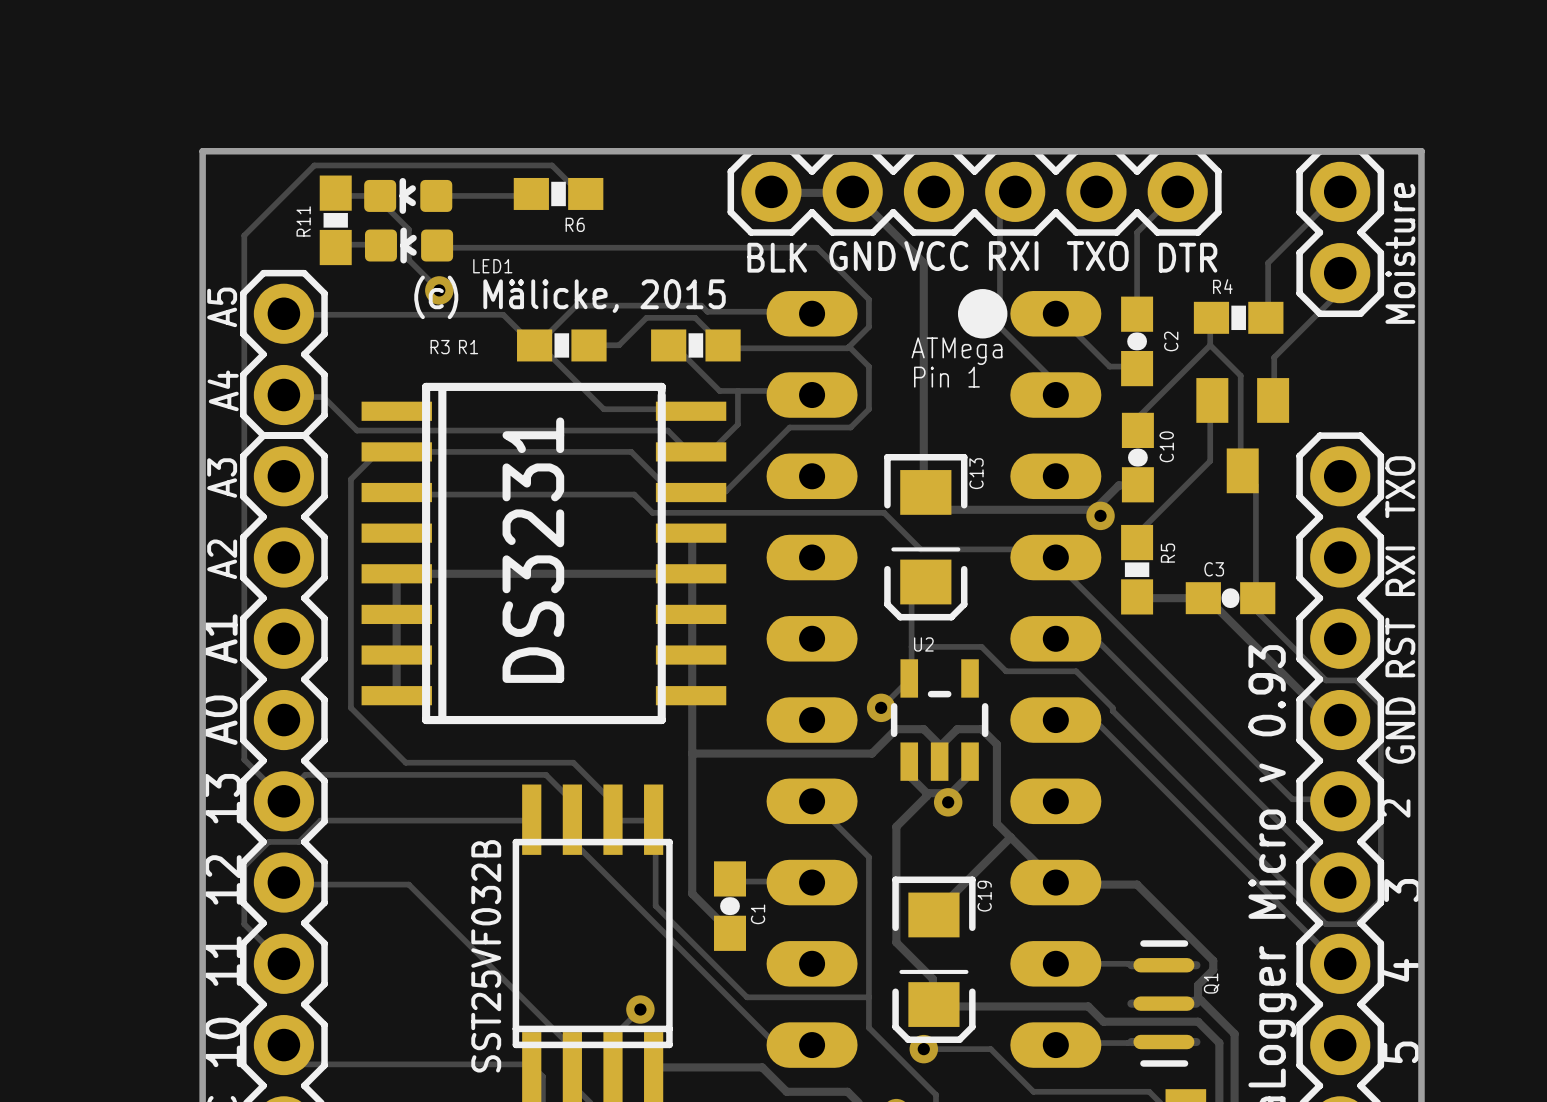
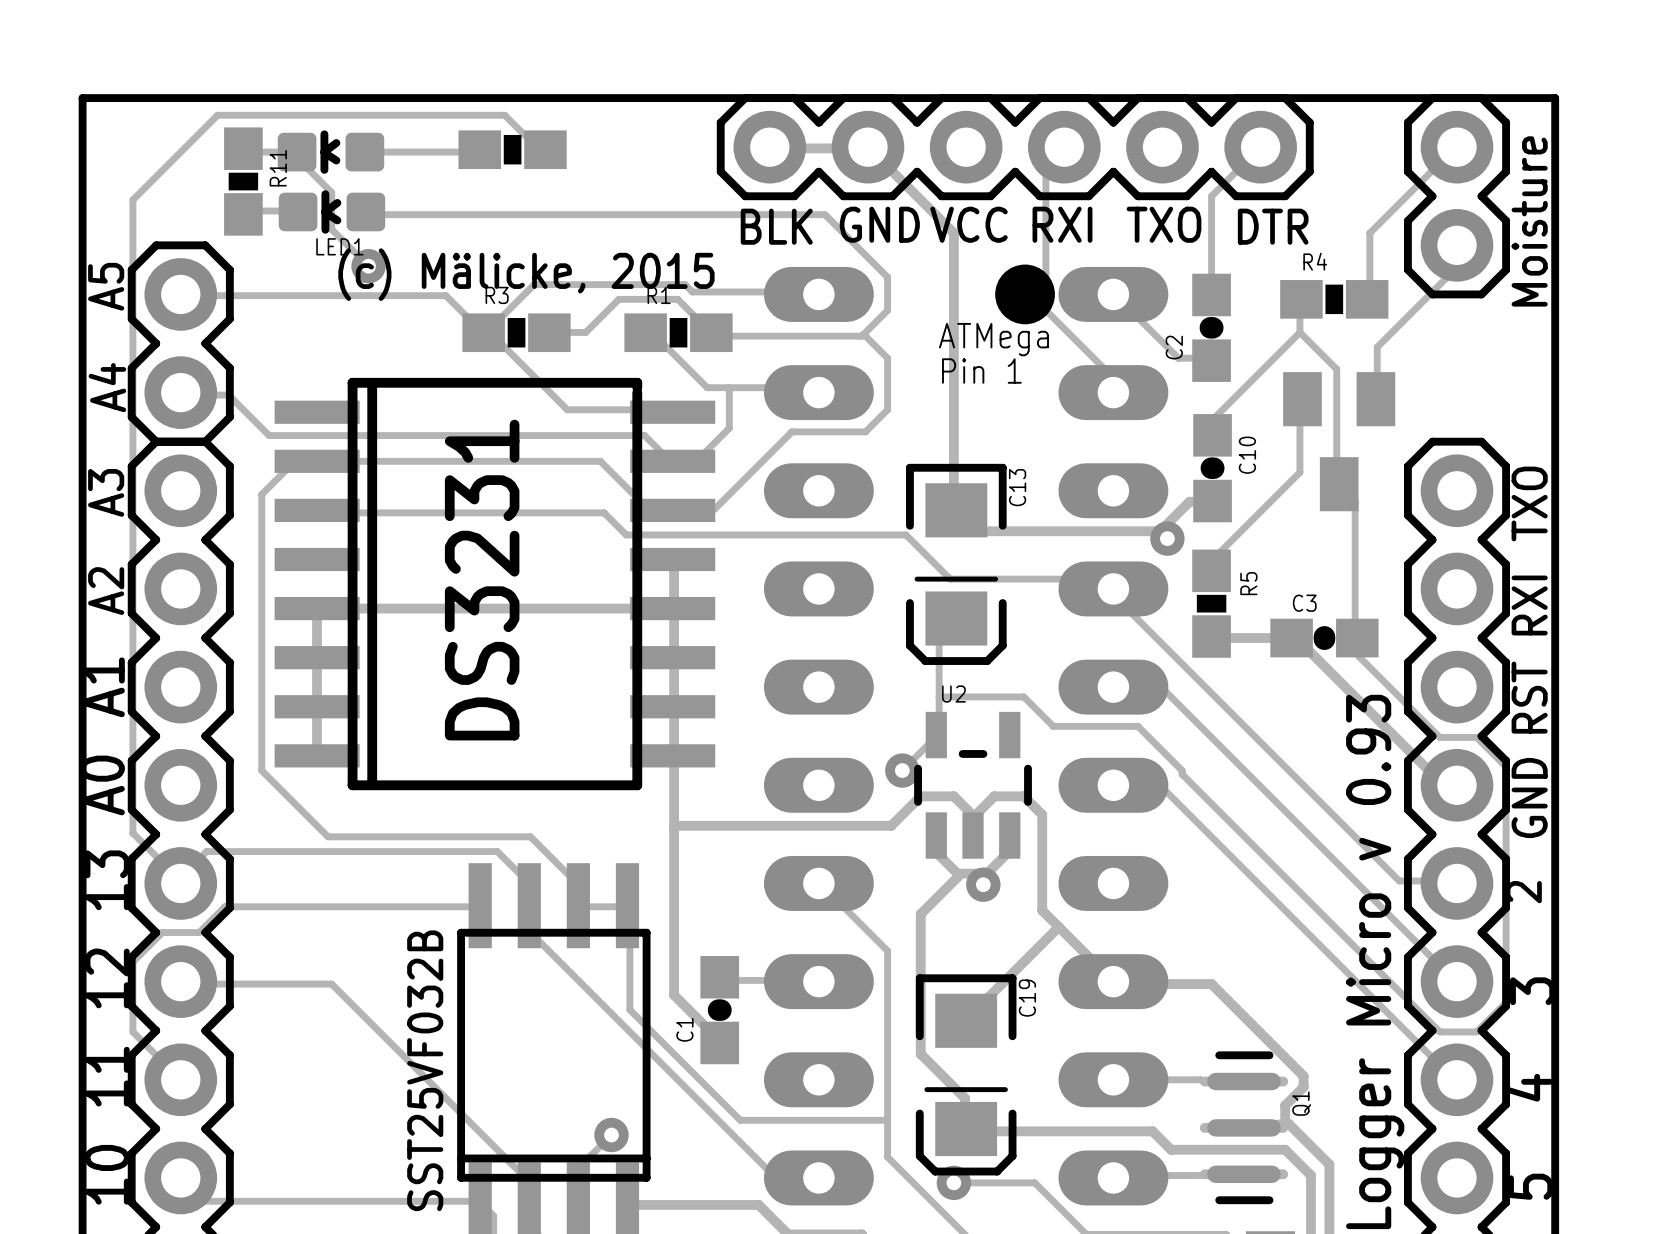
R11 name position: R11 (303, 221) -> R11 (278, 168)
R6 name: R6 (575, 224) -> none
LED1 name position: LED1 (492, 266) -> LED1 (339, 246)
C2 name position: C2 (1171, 341) -> C2 (1174, 347)
R3 name position: R3 (440, 347) -> R3 (497, 295)
R1 name position: R1 (468, 347) -> R1 (659, 295)
C1 name position: C1 (758, 914) -> C1 (684, 1029)

